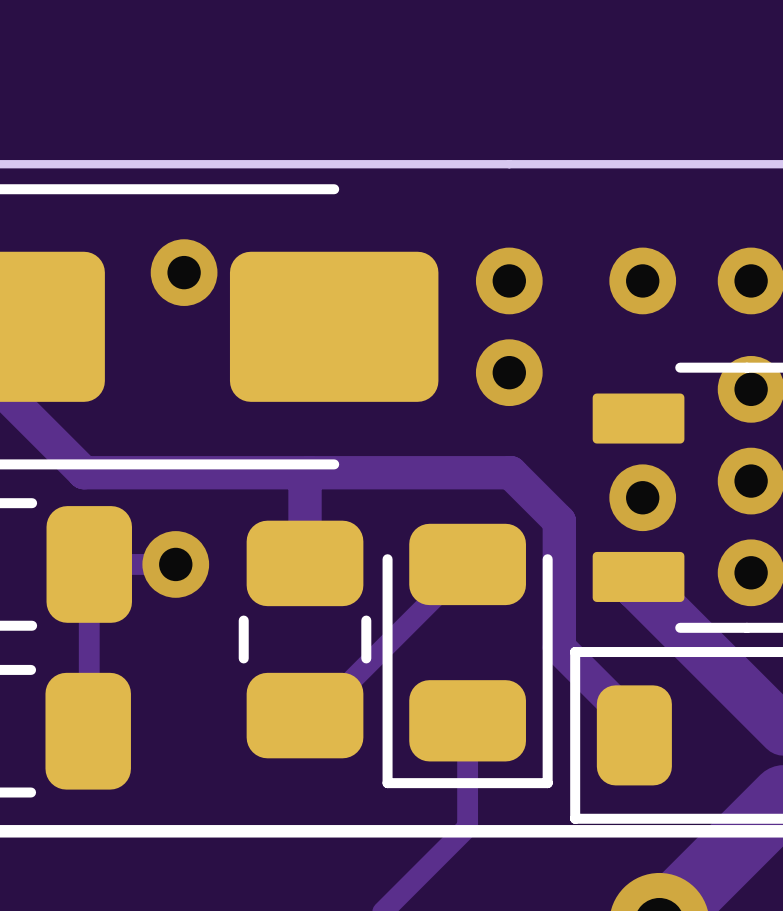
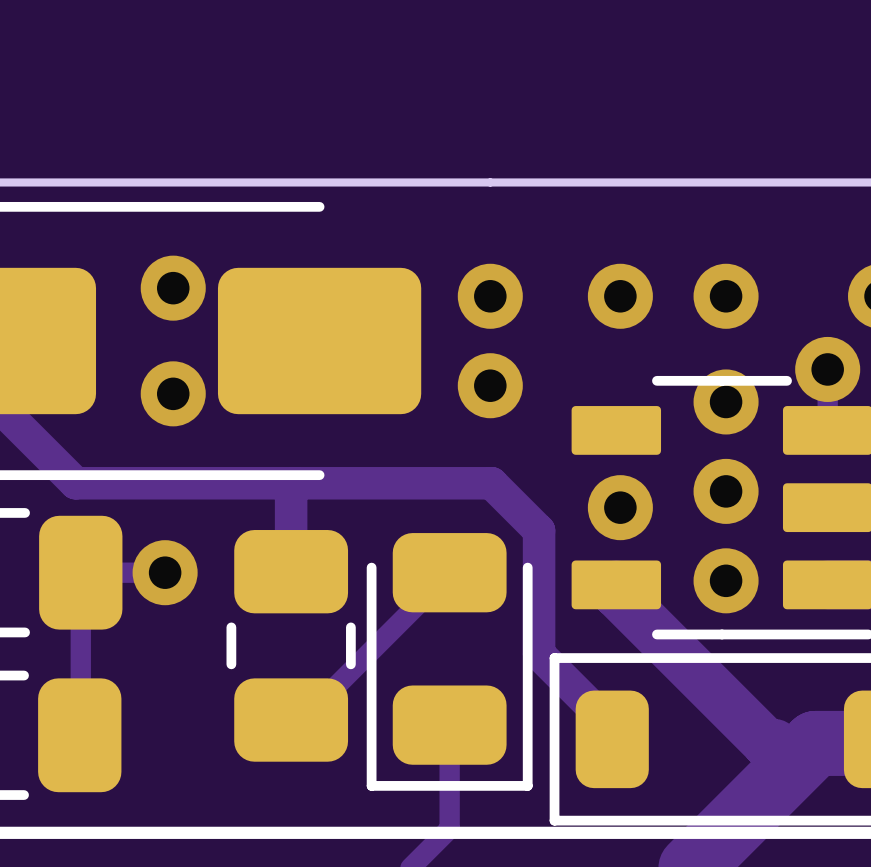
via: none -> (173, 393)

